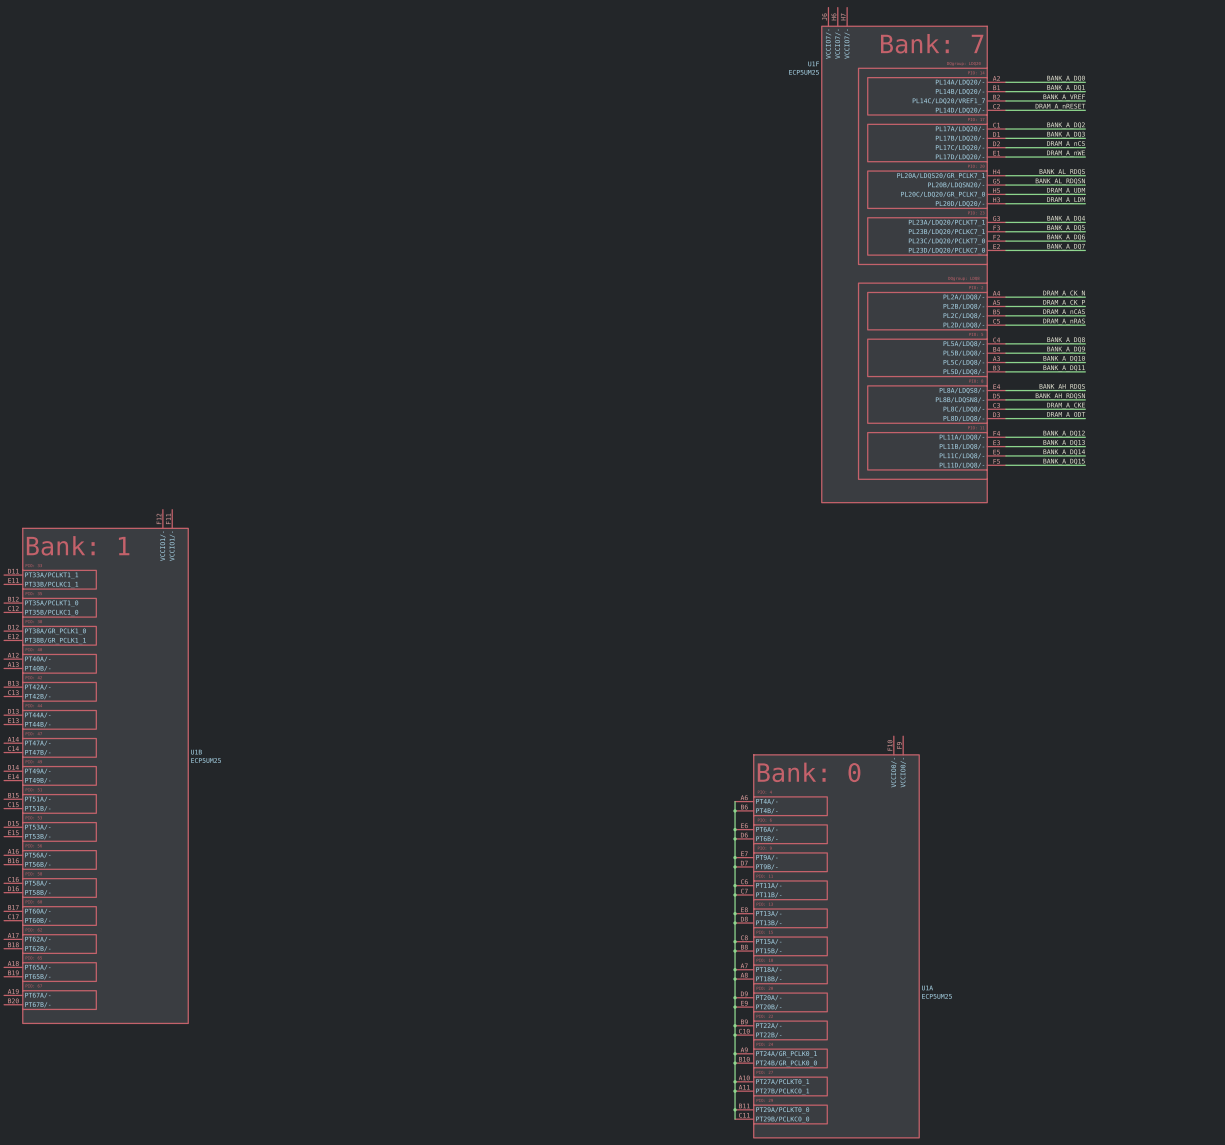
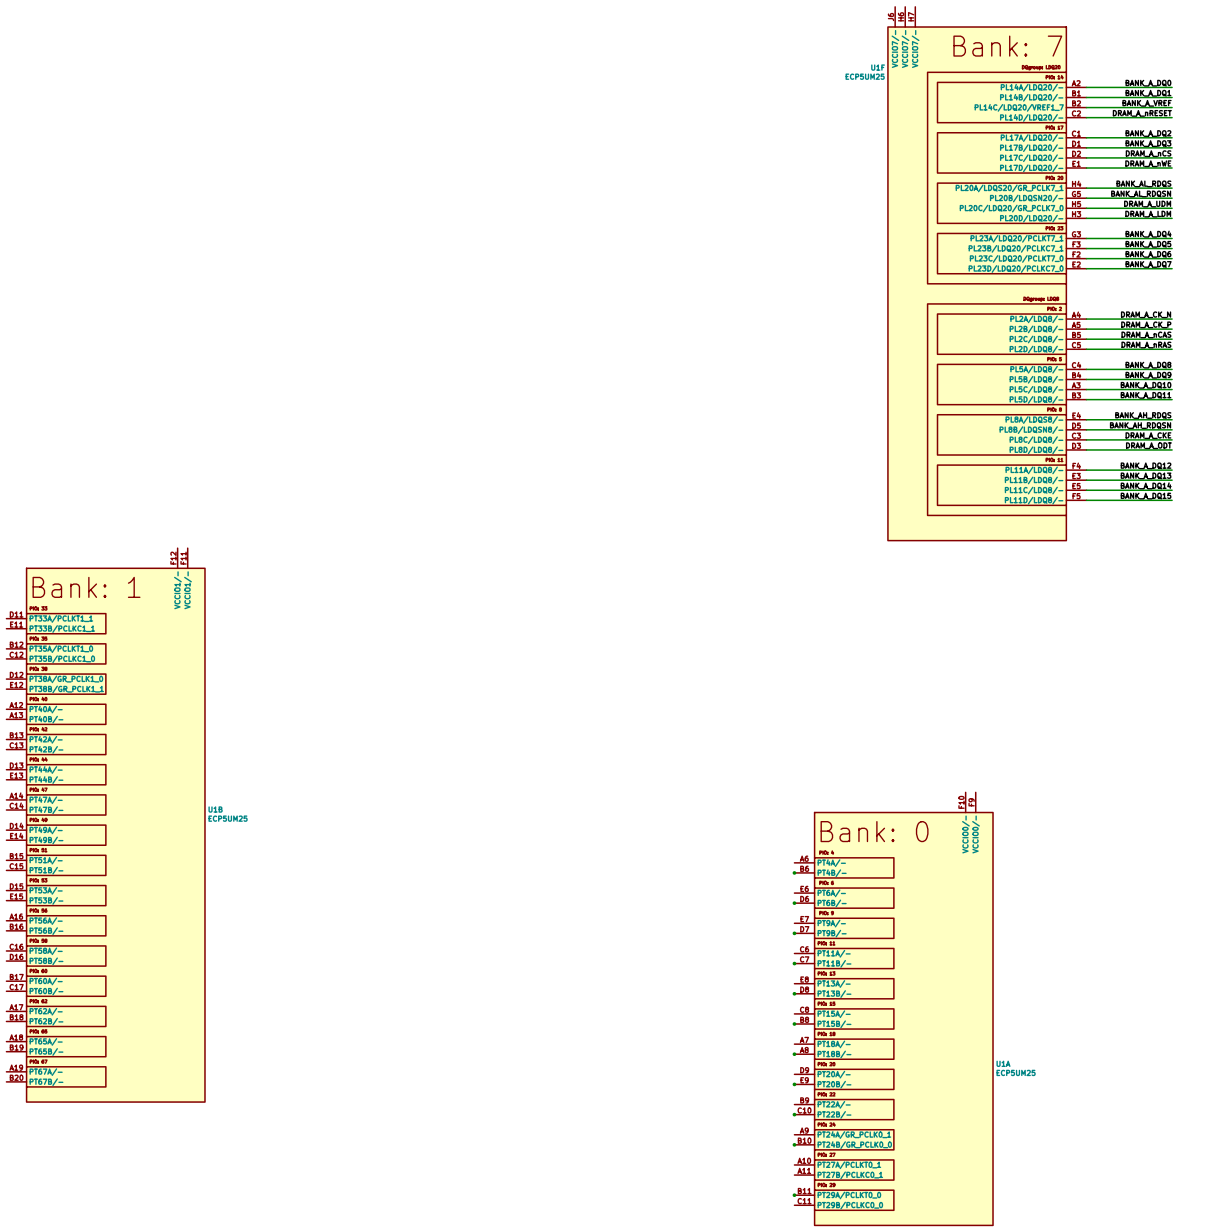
wire: (735, 801) (735, 1119) -> none
junction: (735, 829) -> none
junction: (735, 857) -> none
junction: (735, 885) -> none
junction: (735, 913) -> none
junction: (735, 941) -> none
junction: (735, 969) -> none
junction: (735, 997) -> none
junction: (735, 1025) -> none
junction: (735, 1053) -> none
junction: (735, 1081) -> none
junction: (735, 1091) -> none

